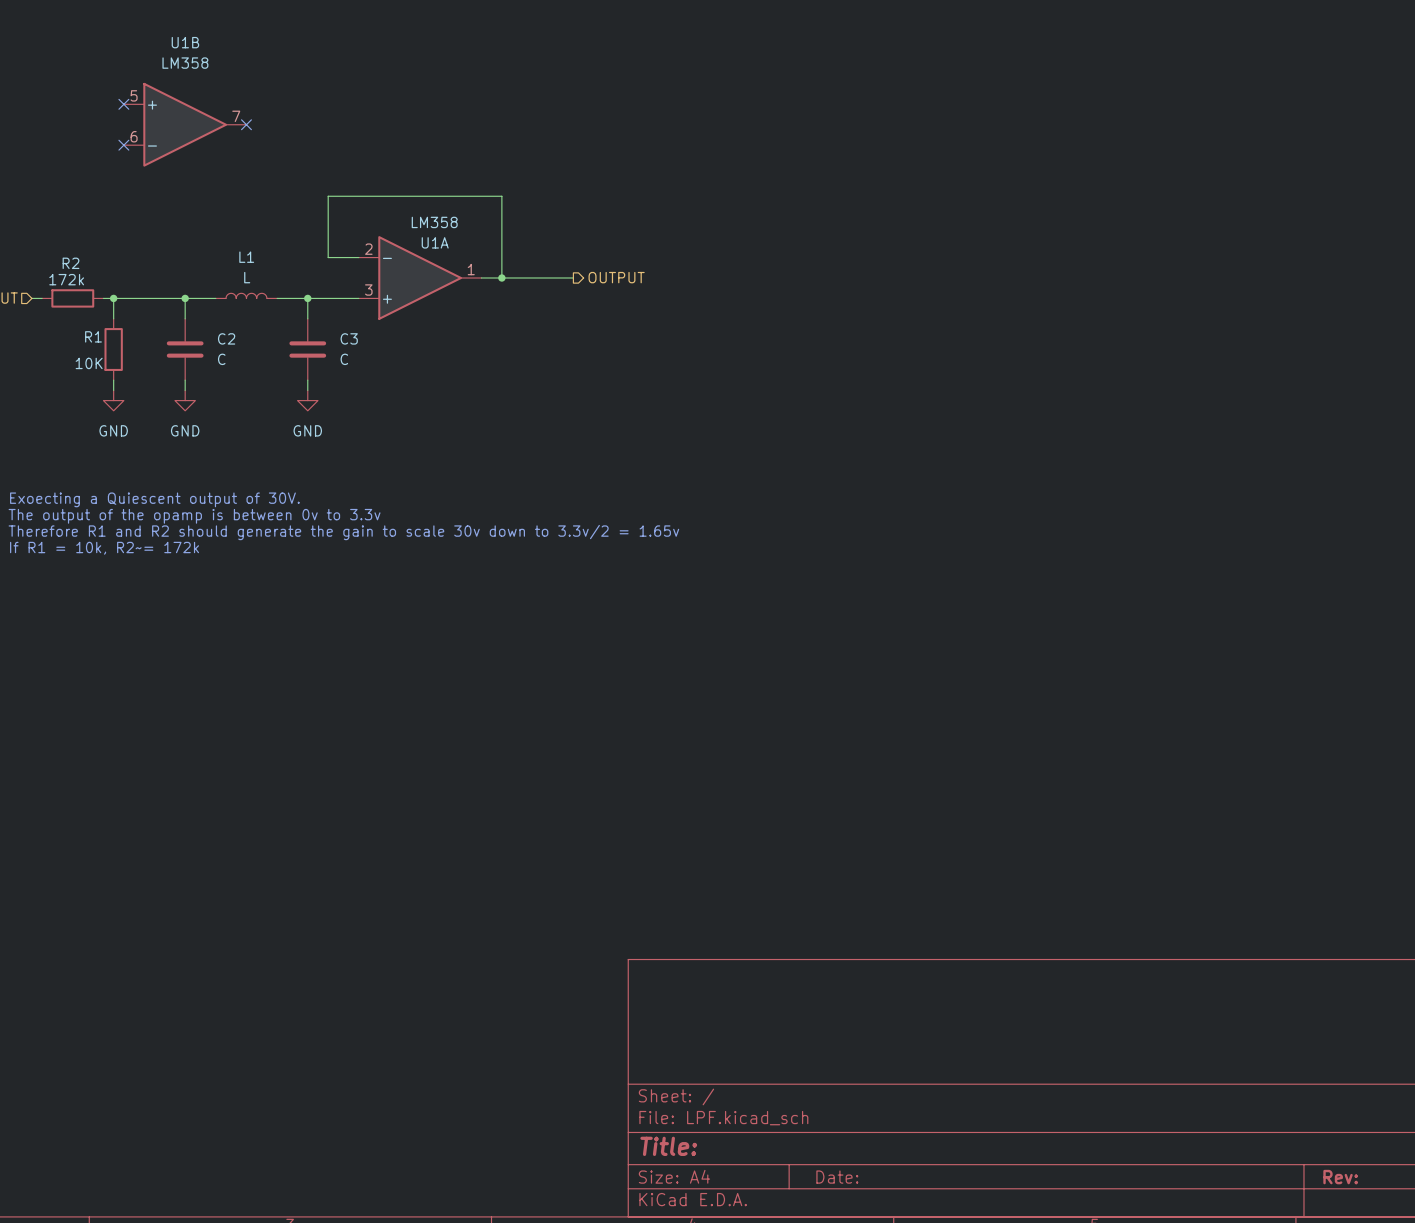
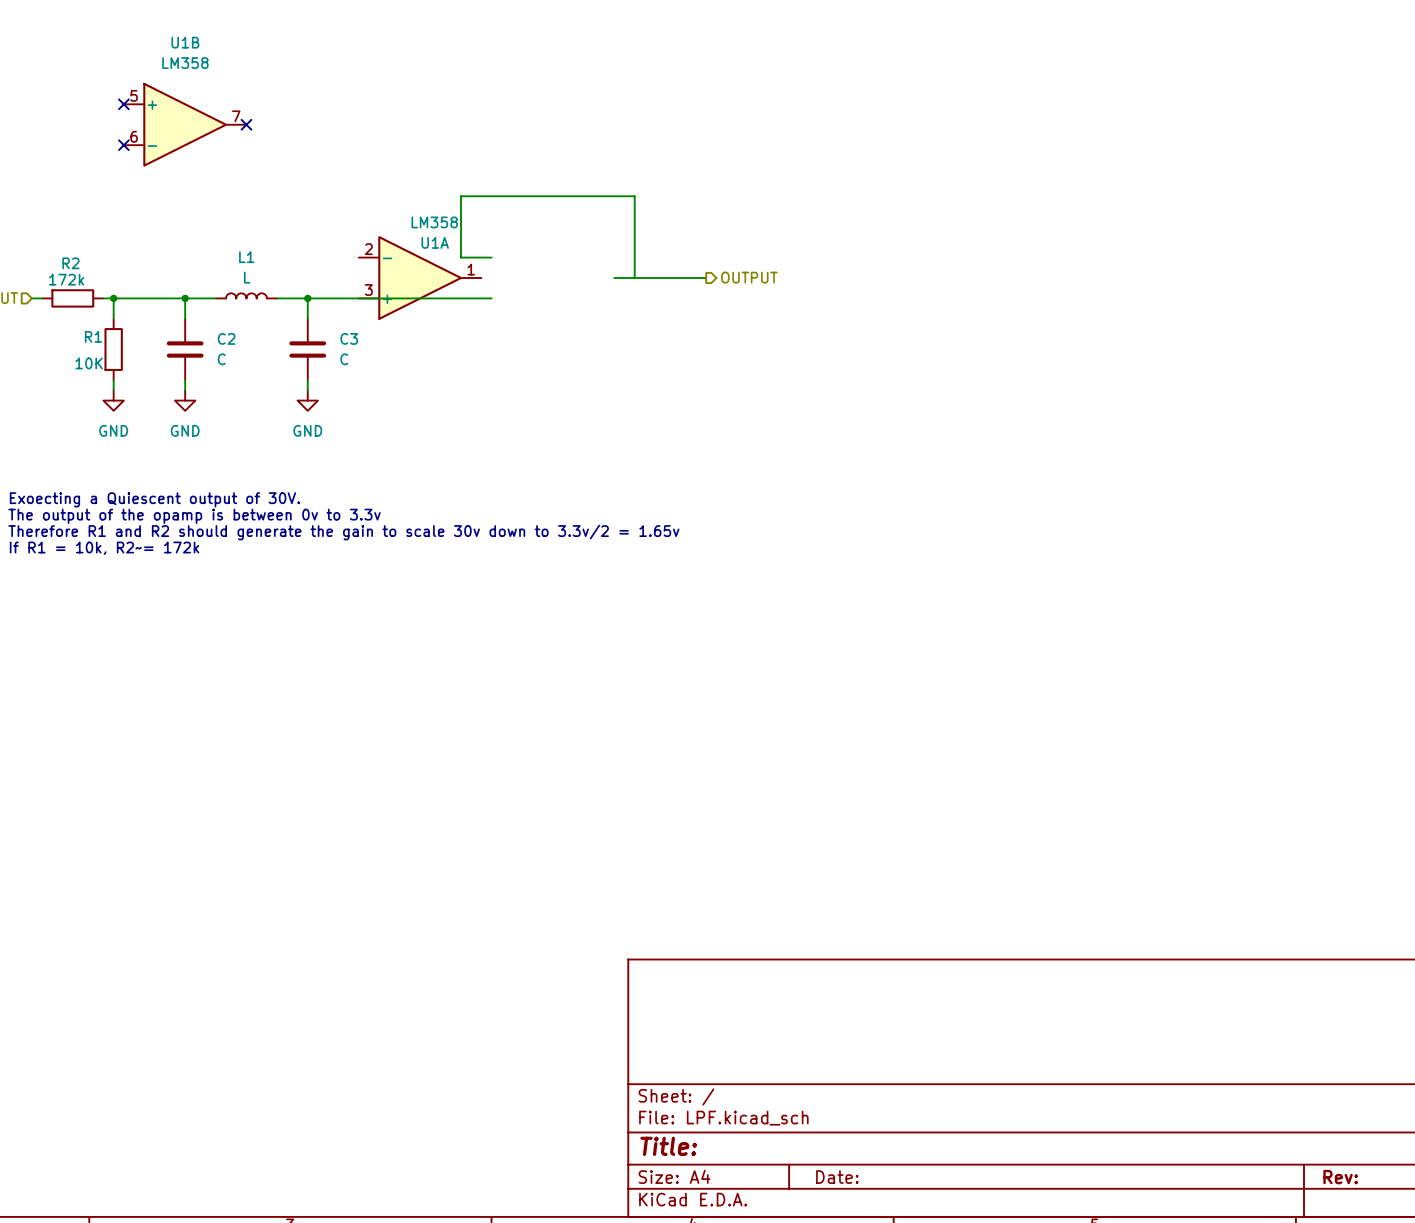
wire: (461, 196) (328, 196) (328, 257) (358, 257) -> (461, 196) (461, 257) (491, 257)
wire: (501, 196) (501, 277) -> (501, 196) (634, 196) (634, 277)
wire: (481, 277) (573, 277) -> (614, 277) (706, 277)
junction: (501, 277) -> none
hierarchical label position: OUTPUT (616, 277) -> OUTPUT (749, 277)
wire: none -> (358, 298) (491, 298)

